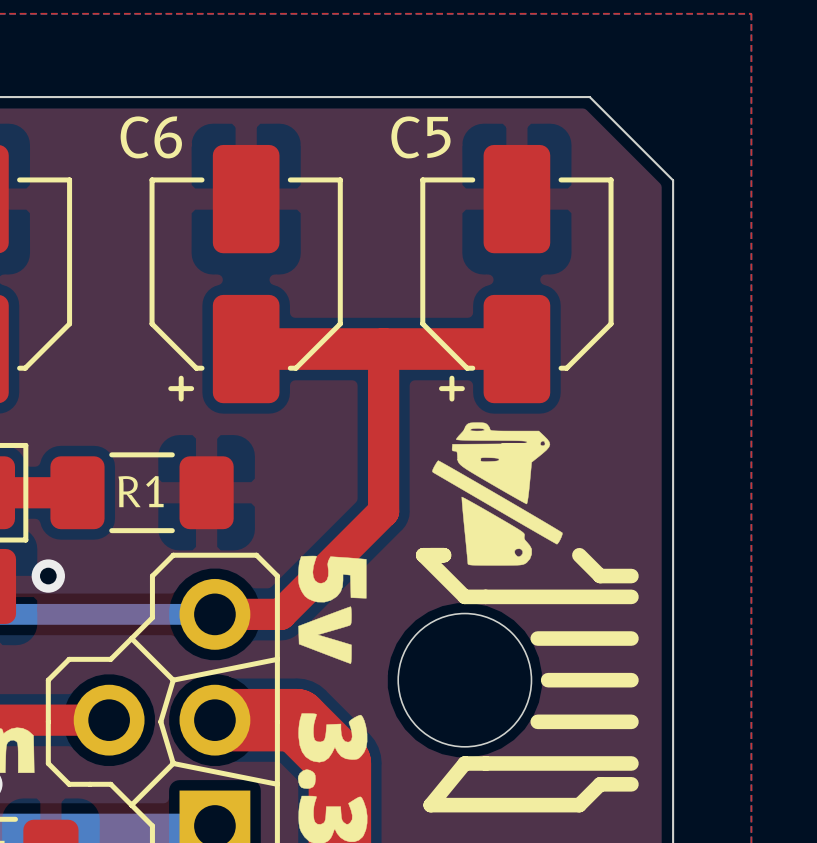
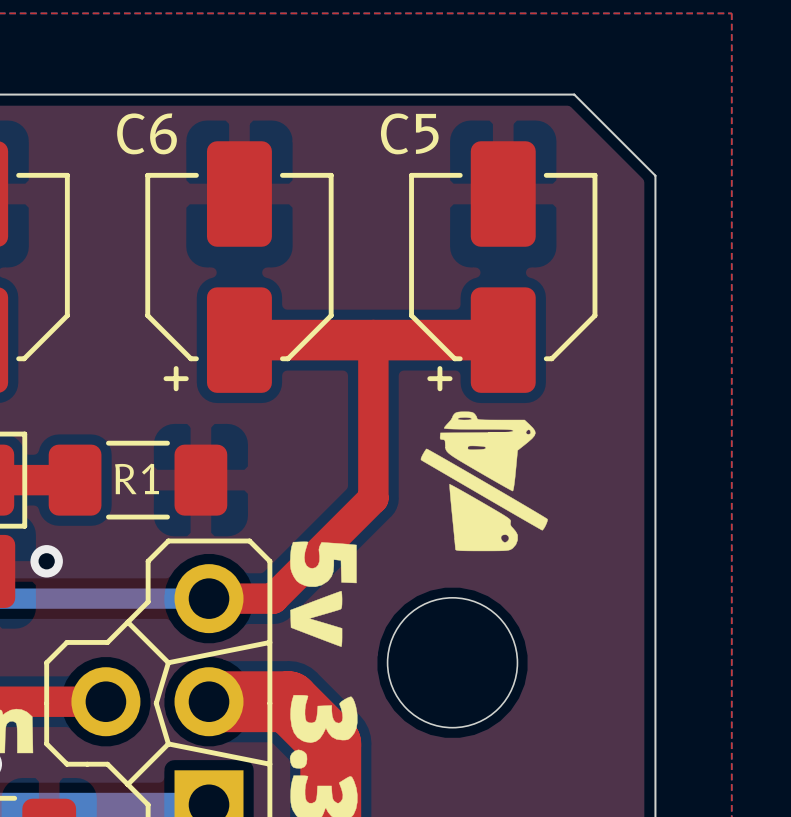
line: (444, 555) (423, 555) (464, 596) (631, 596) -> none
line: (579, 555) (600, 576) (631, 576) -> none
line: (537, 638) (631, 638) -> none
line: (548, 680) (631, 680) -> none
line: (537, 721) (631, 721) -> none
line: (631, 763) (464, 763) (430, 805) (579, 805) (600, 784) (631, 784) -> none

